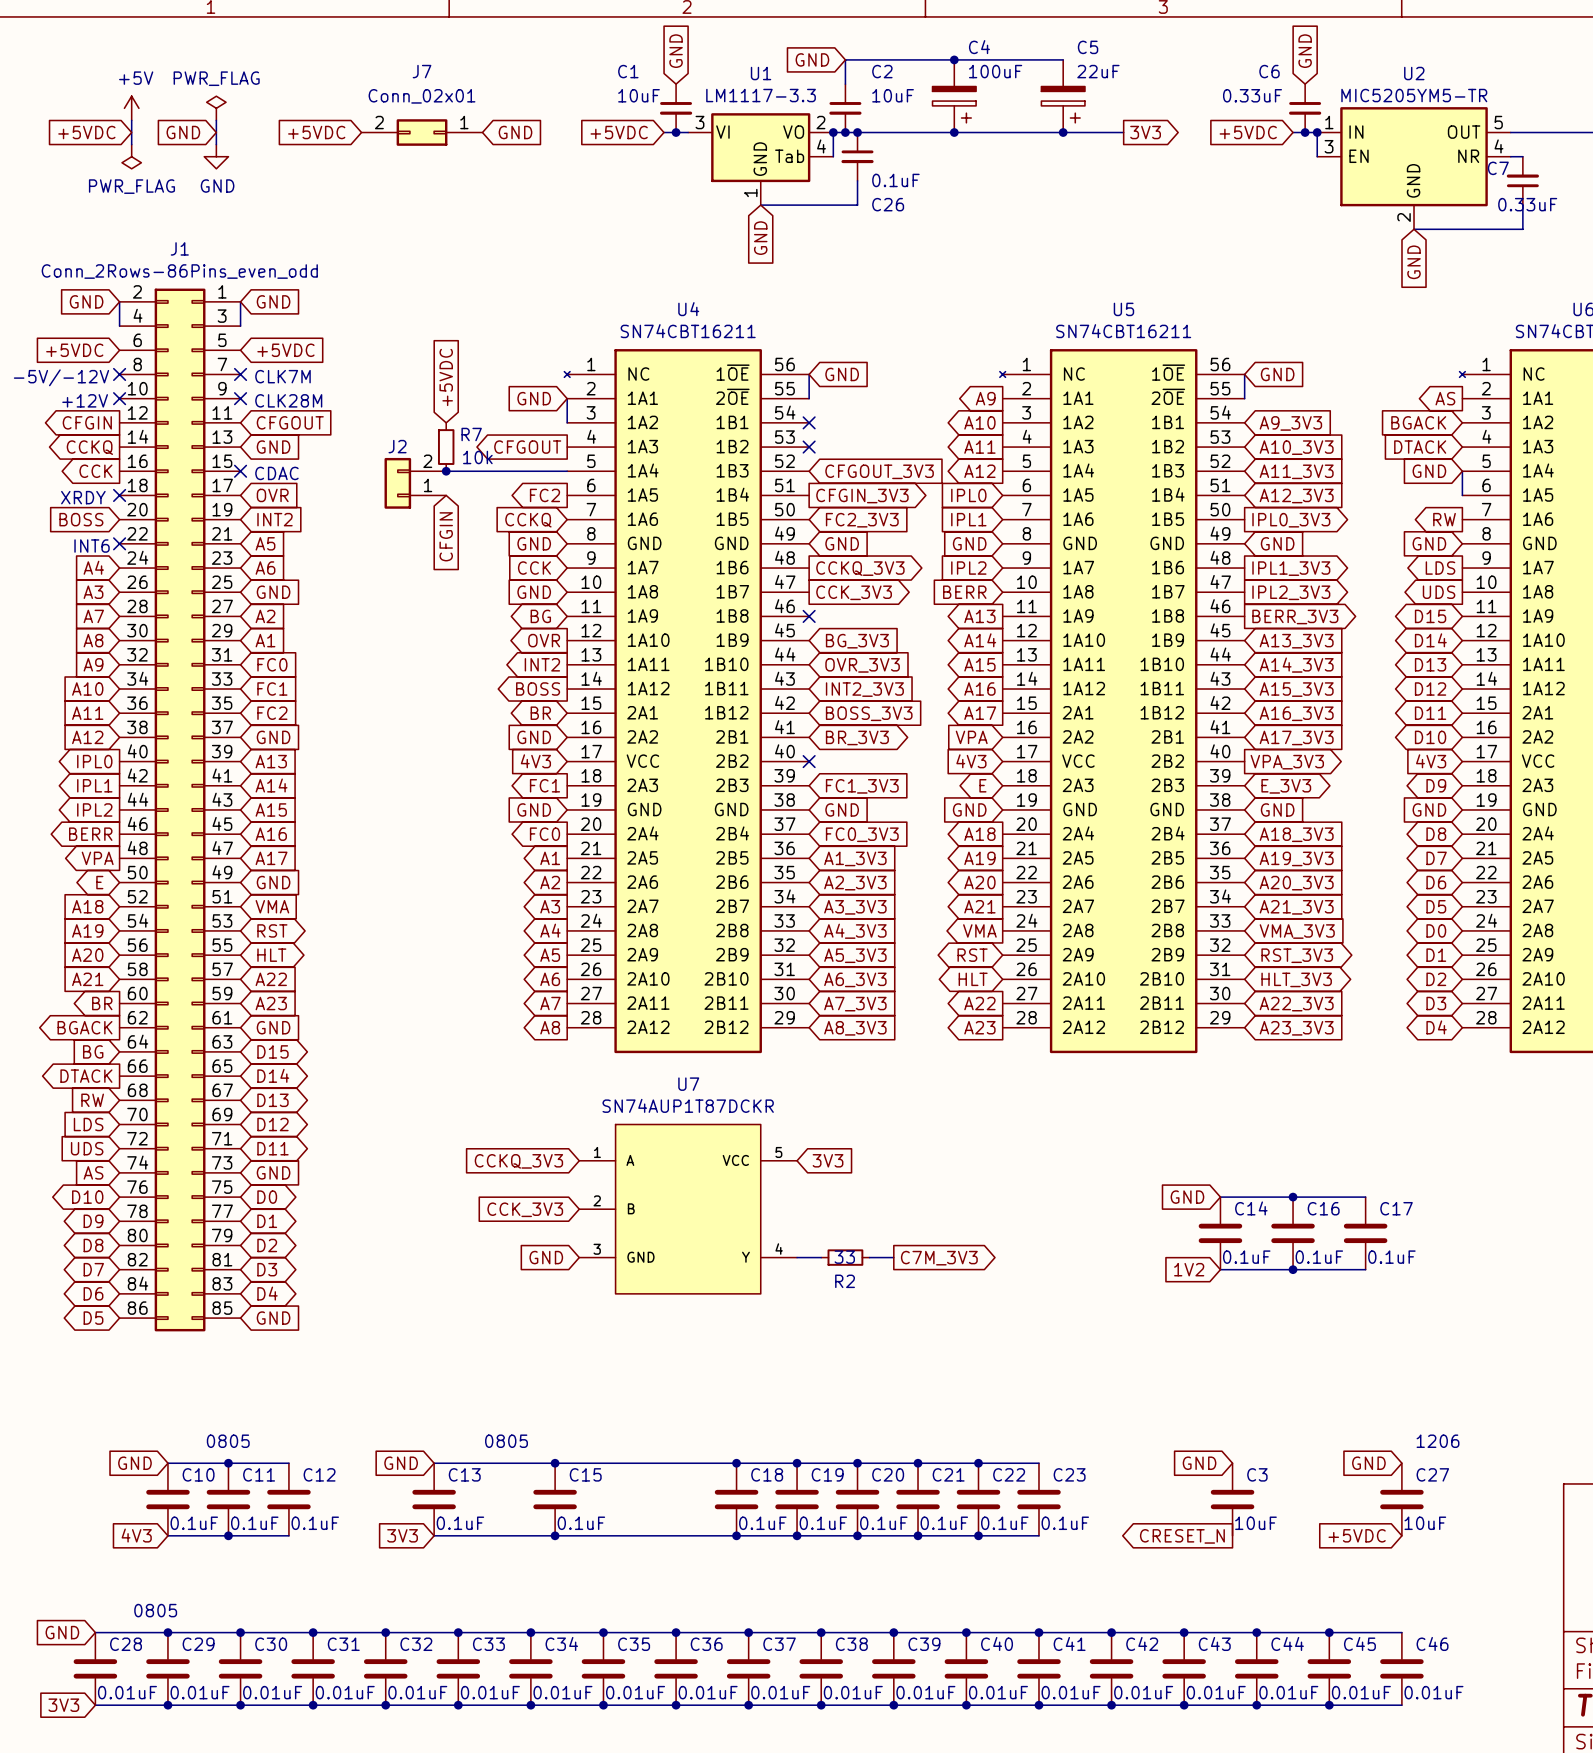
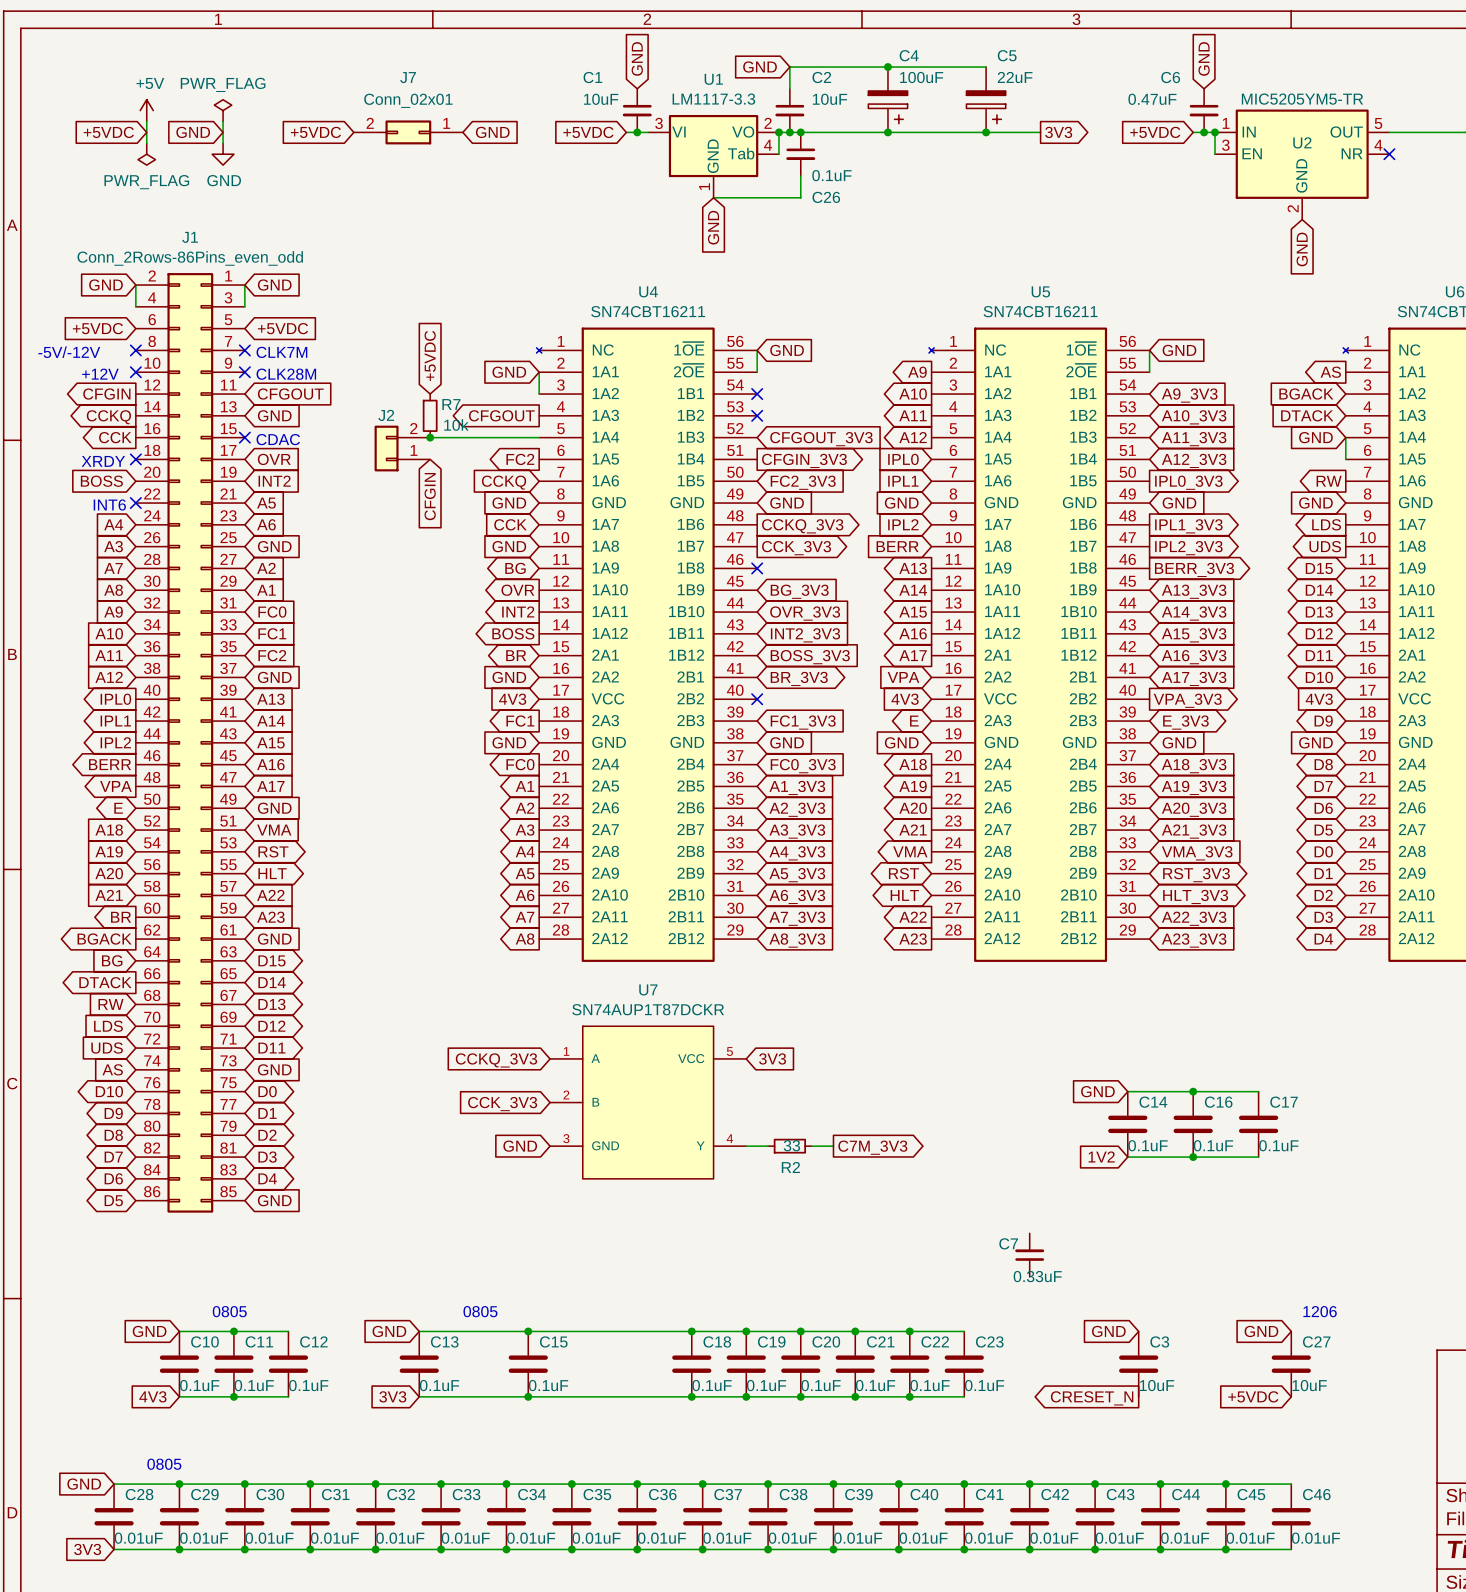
U2 name position: U2 (1414, 73) -> U2 (1302, 142)
C6 value: 0.33uF (1252, 95) -> 0.47uF (1152, 99)
wire: (1510, 156) (1522, 156) -> none
no-connect mark: none -> (1389, 154)
C7 position: (1522, 180) -> (1029, 1255)
wire: (1522, 205) (1522, 229) (1414, 229) -> none

